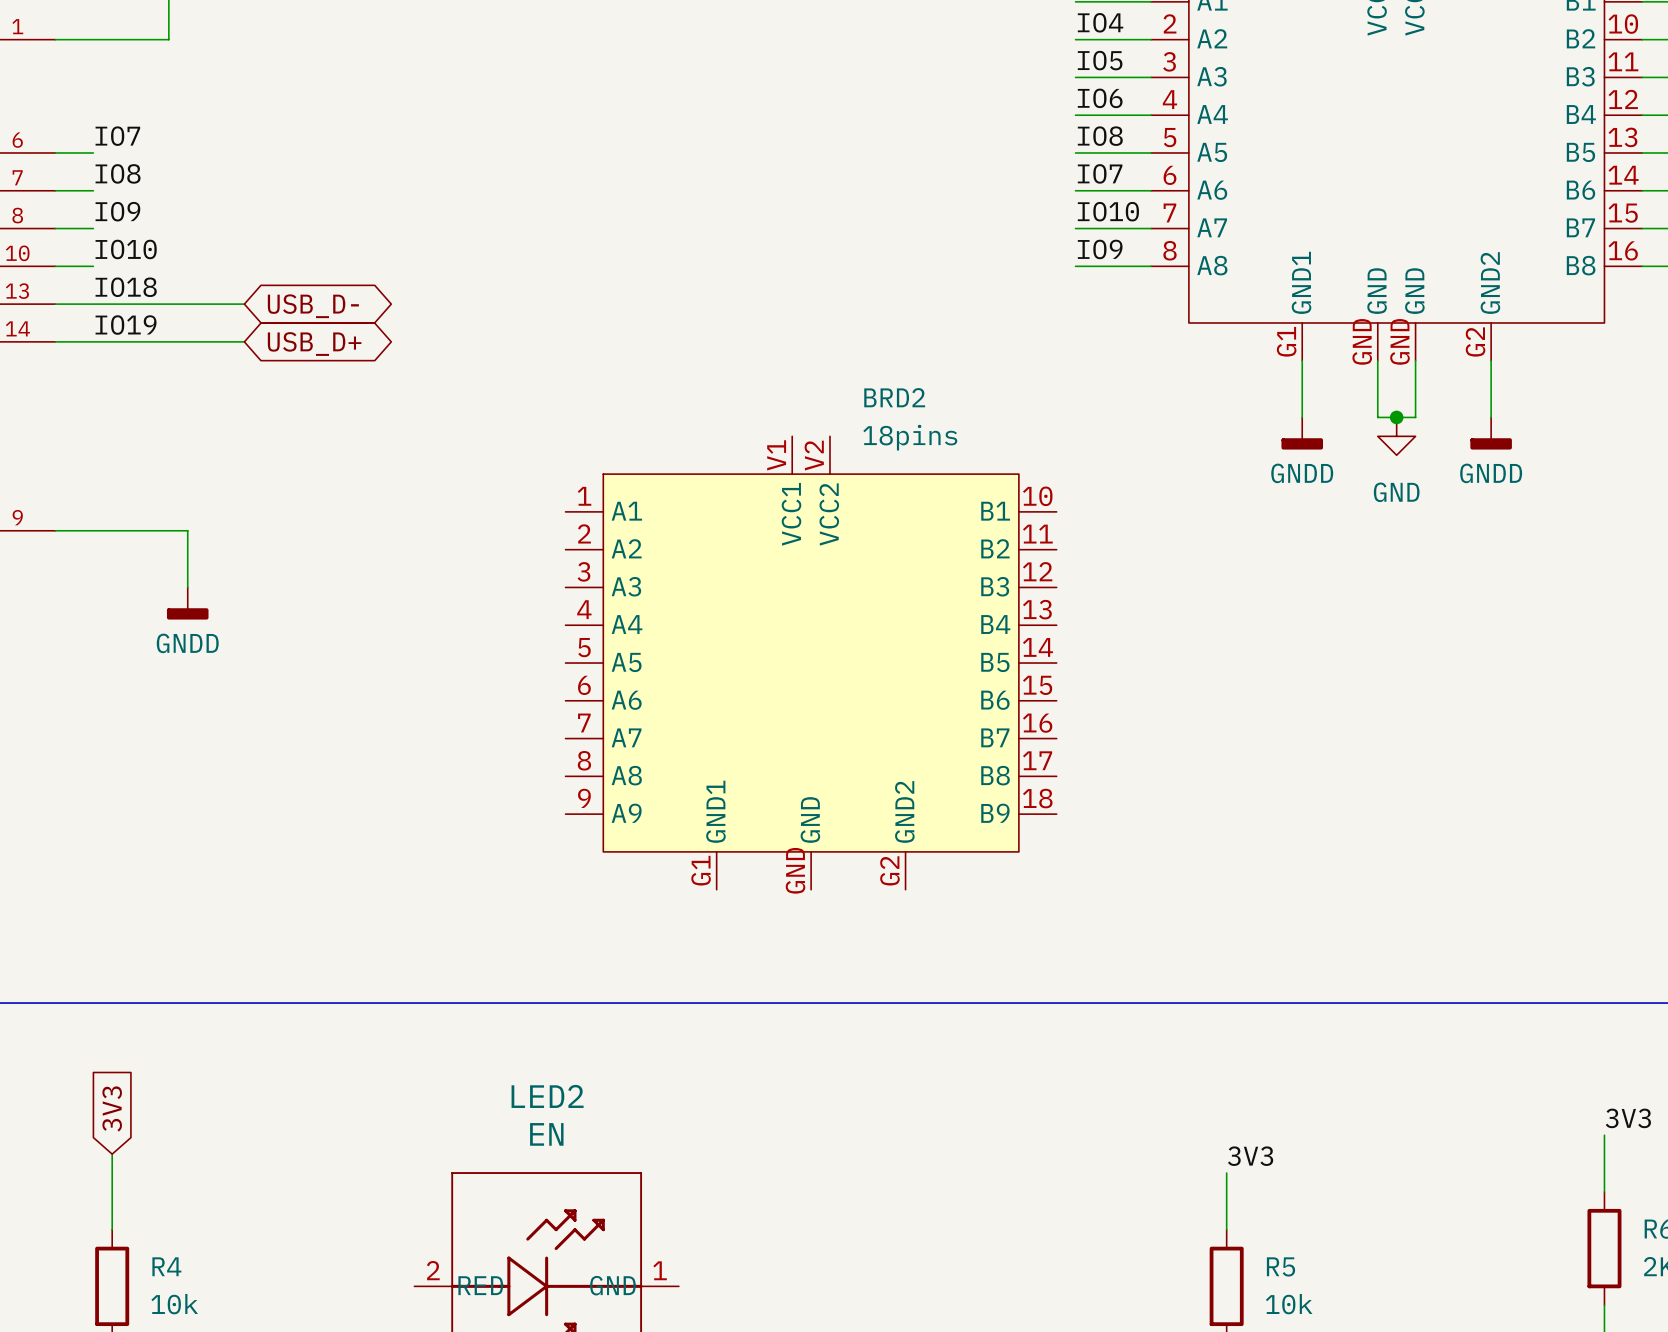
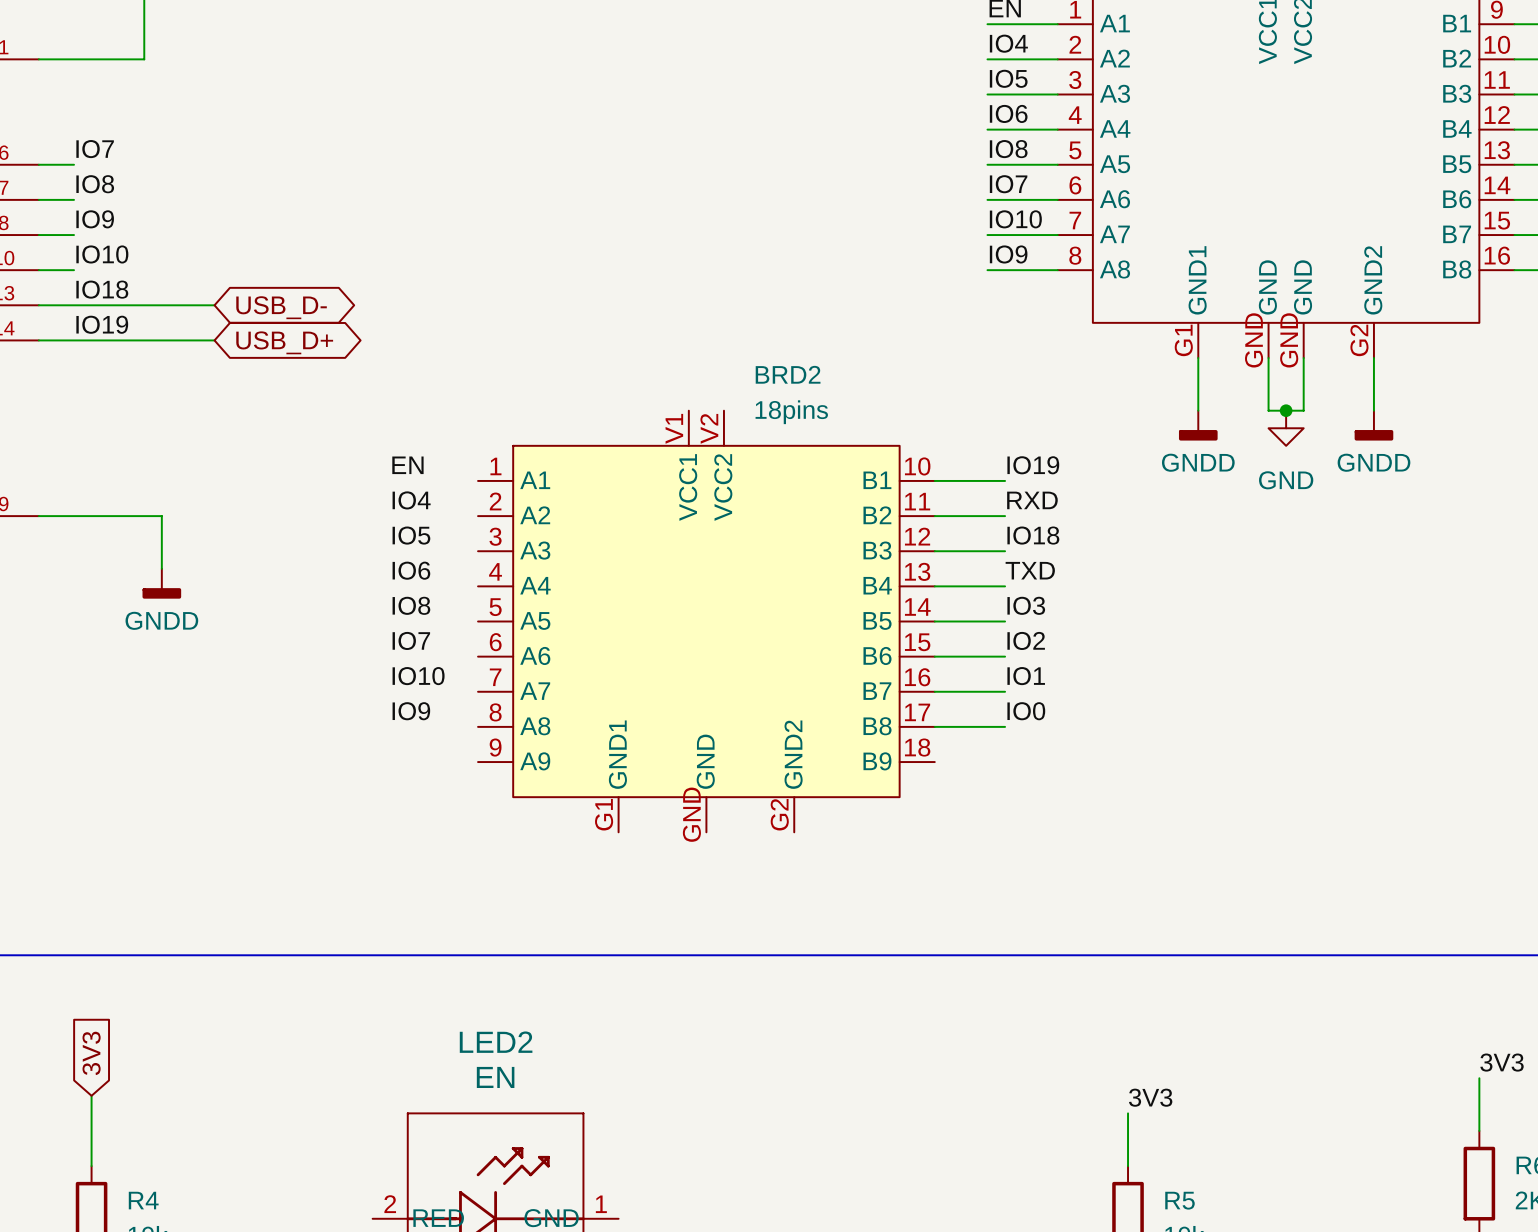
label: none -> EN (407, 465)
label: none -> IO19 (1033, 465)
wire: none -> (934, 480) (1005, 480)
label: none -> IO4 (411, 500)
label: none -> RXD (1032, 500)
wire: none -> (934, 516) (1005, 516)
label: none -> IO5 (411, 535)
label: none -> IO18 (1033, 535)
wire: none -> (934, 551) (1005, 551)
label: none -> IO6 (411, 570)
label: none -> TXD (1030, 570)
wire: none -> (934, 586) (1005, 586)
label: none -> IO8 (411, 605)
label: none -> IO3 (1026, 605)
wire: none -> (934, 621) (1005, 621)
BRD2 position: (811, 663) -> (706, 621)
label: none -> IO7 (411, 640)
label: none -> IO2 (1026, 640)
wire: none -> (934, 656) (1005, 656)
label: none -> IO10 (418, 676)
label: none -> IO1 (1026, 676)
wire: none -> (934, 691) (1005, 691)
label: none -> IO9 (411, 711)
label: none -> IO0 (1026, 711)
wire: none -> (934, 726) (1005, 726)

